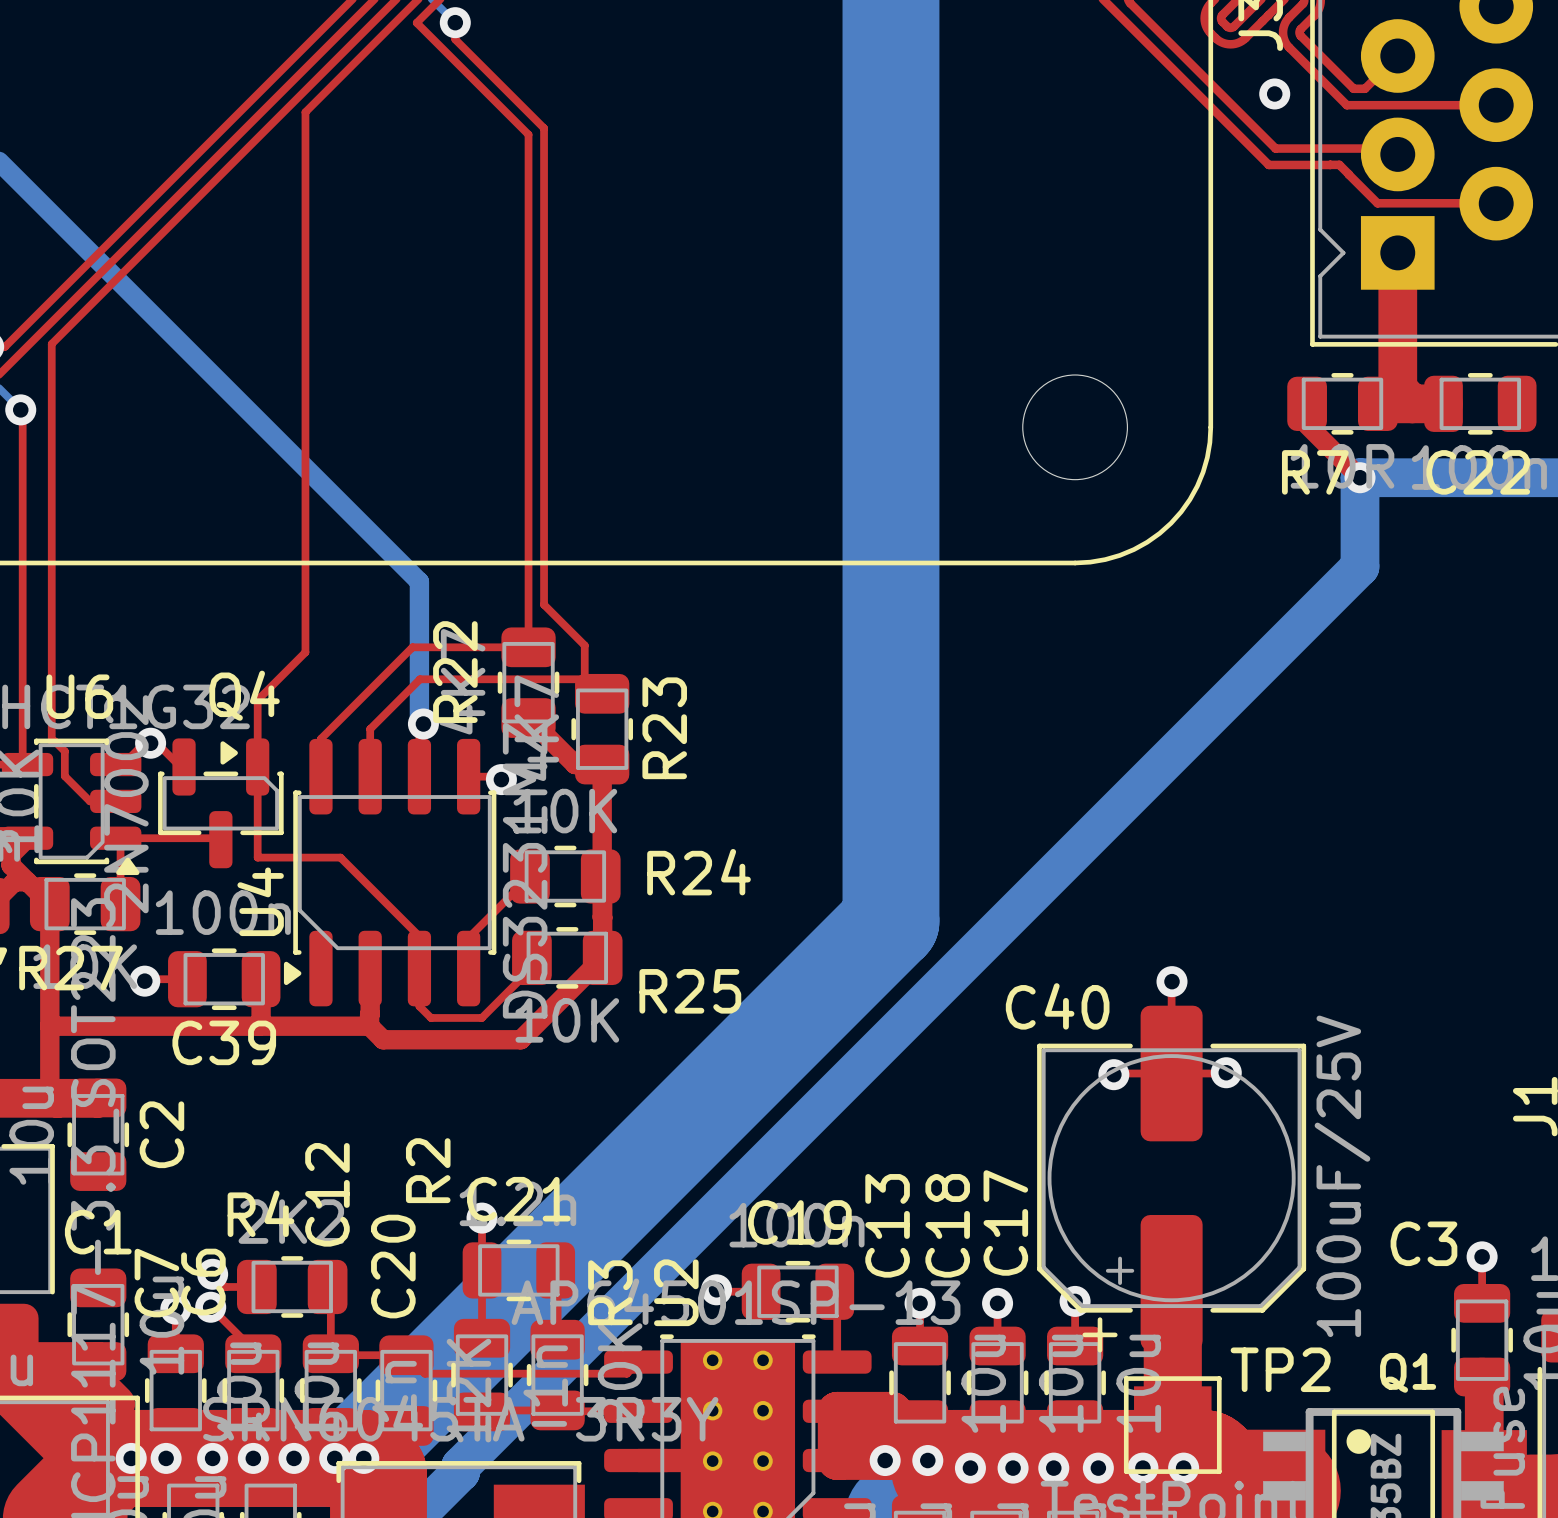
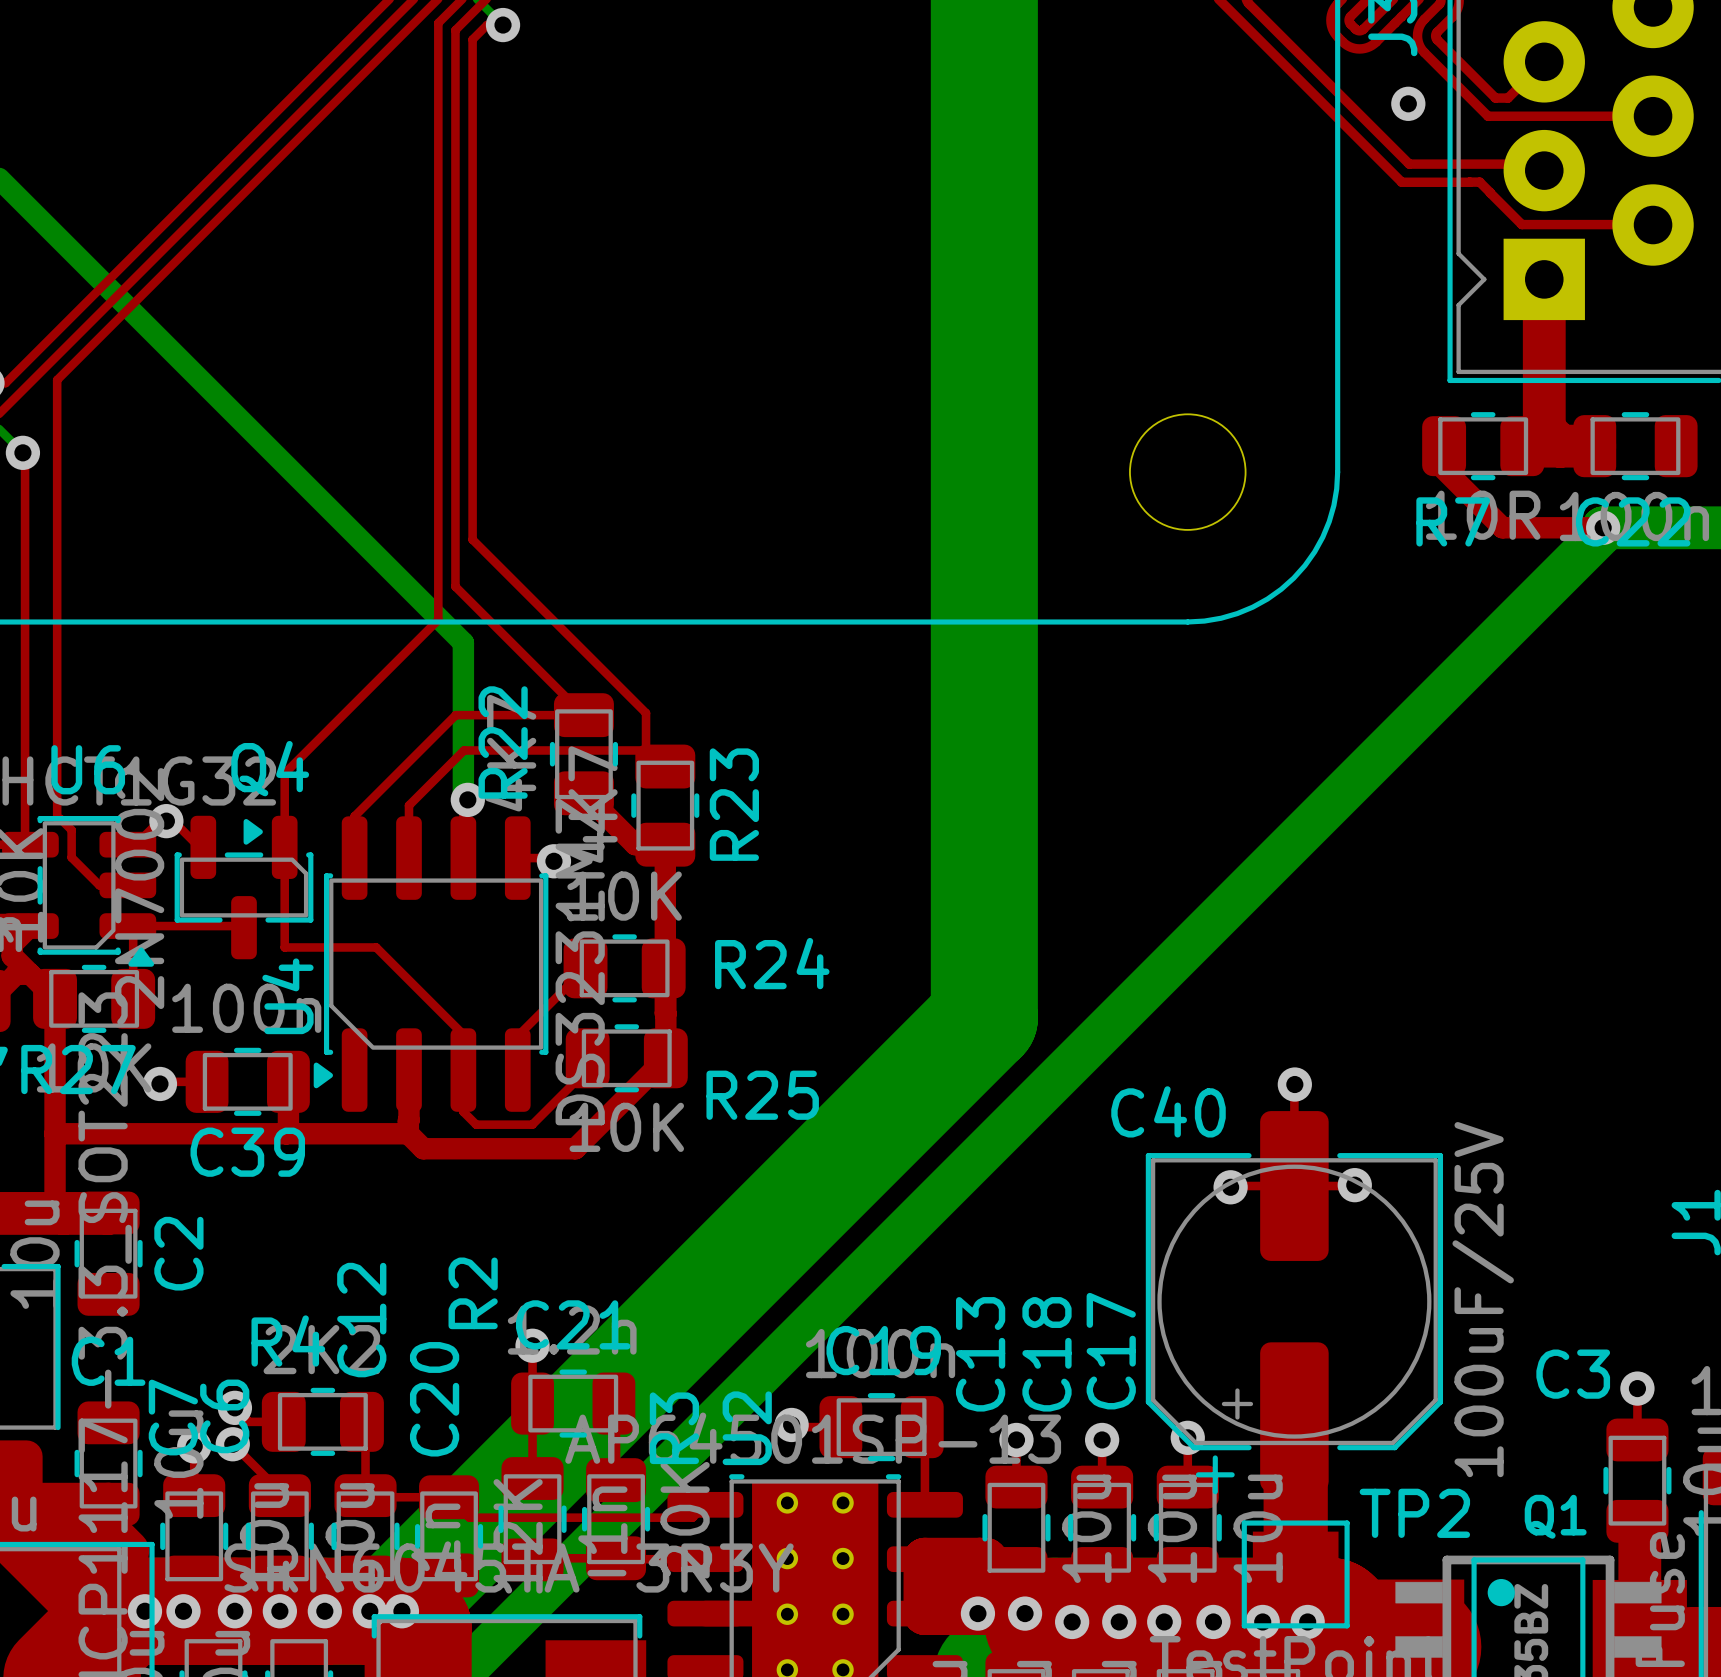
top track: (396, 20) (305, 112) (305, 652) -> (438, 23) (438, 619) (337, 720)
top track: (416, 22) (528, 134) (528, 647) -> (460, 25) (455, 30) (455, 586) (583, 715)
top track: (455, 22) (455, 39) (544, 128) (544, 604) -> (503, 25) (487, 25) (472, 39) (472, 539) (601, 668)
top track: none -> (1502, 527) (1603, 527)
via position: (1360, 477) -> (1603, 527)
bottom track: (1451, 477) (1360, 477) (1360, 566) (460, 1466) (460, 1471) -> (1603, 527) (1603, 532) (508, 1626)

